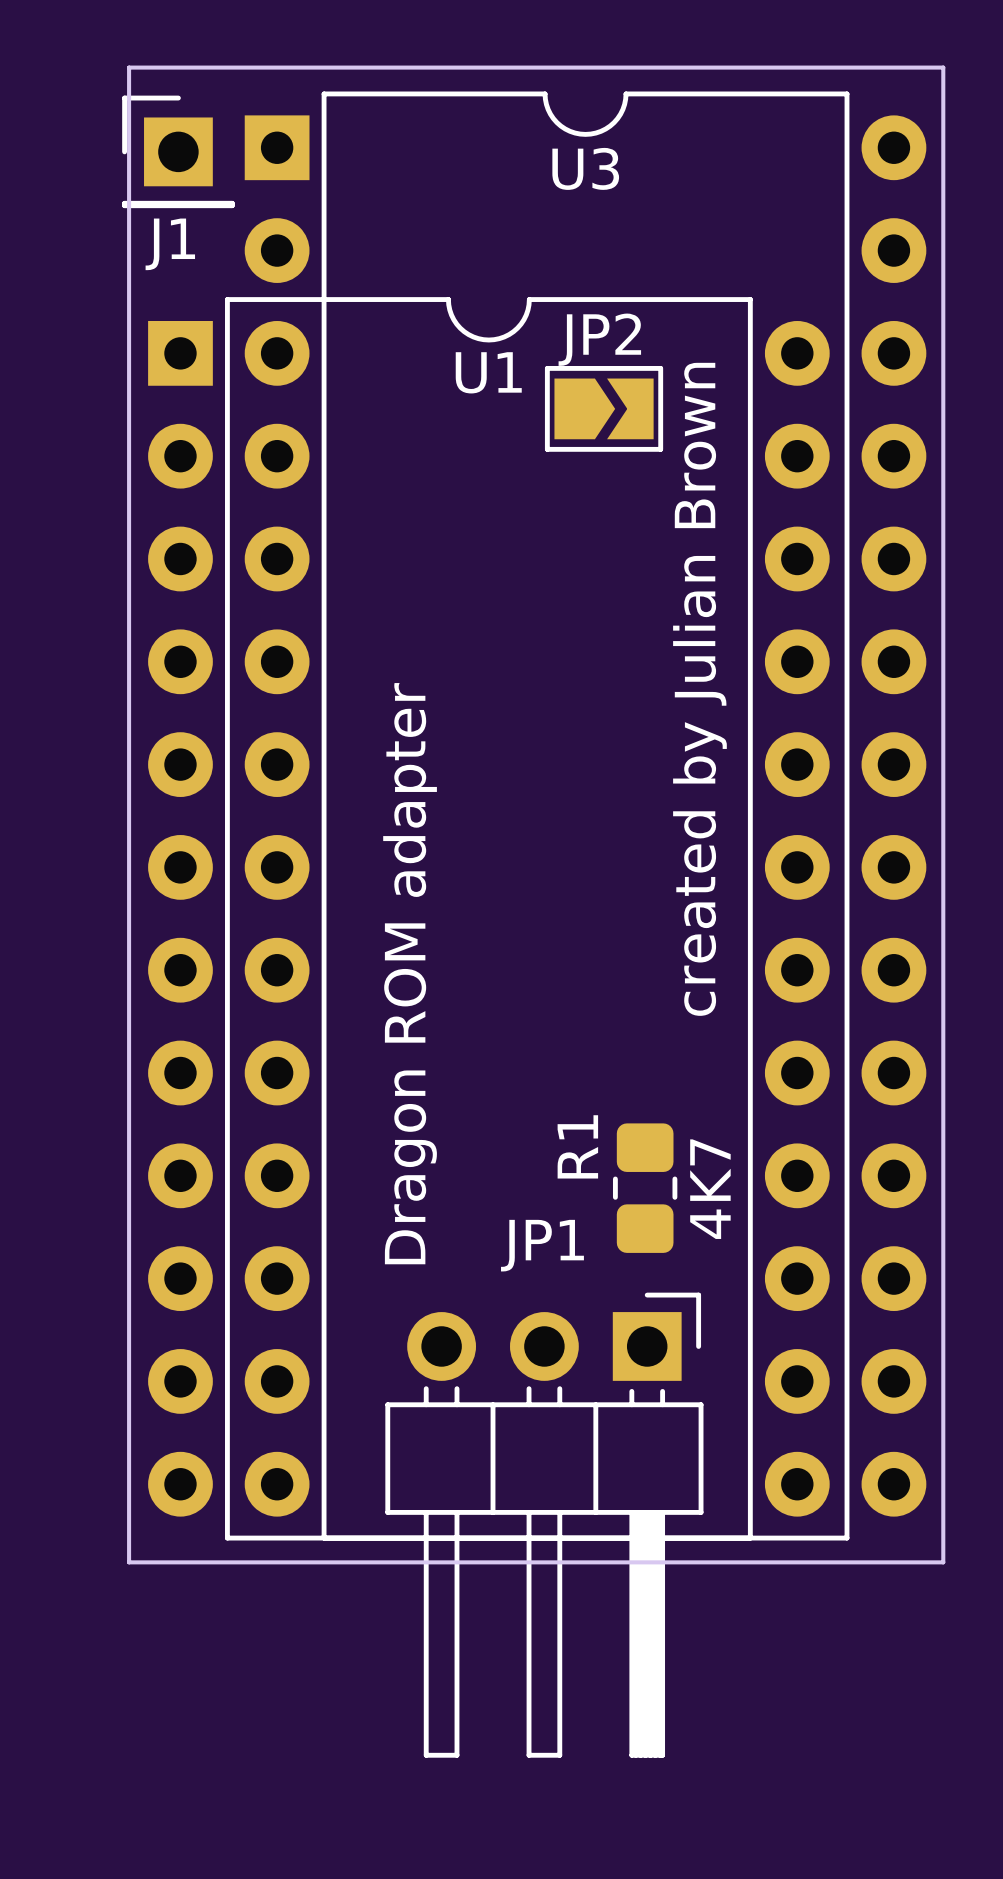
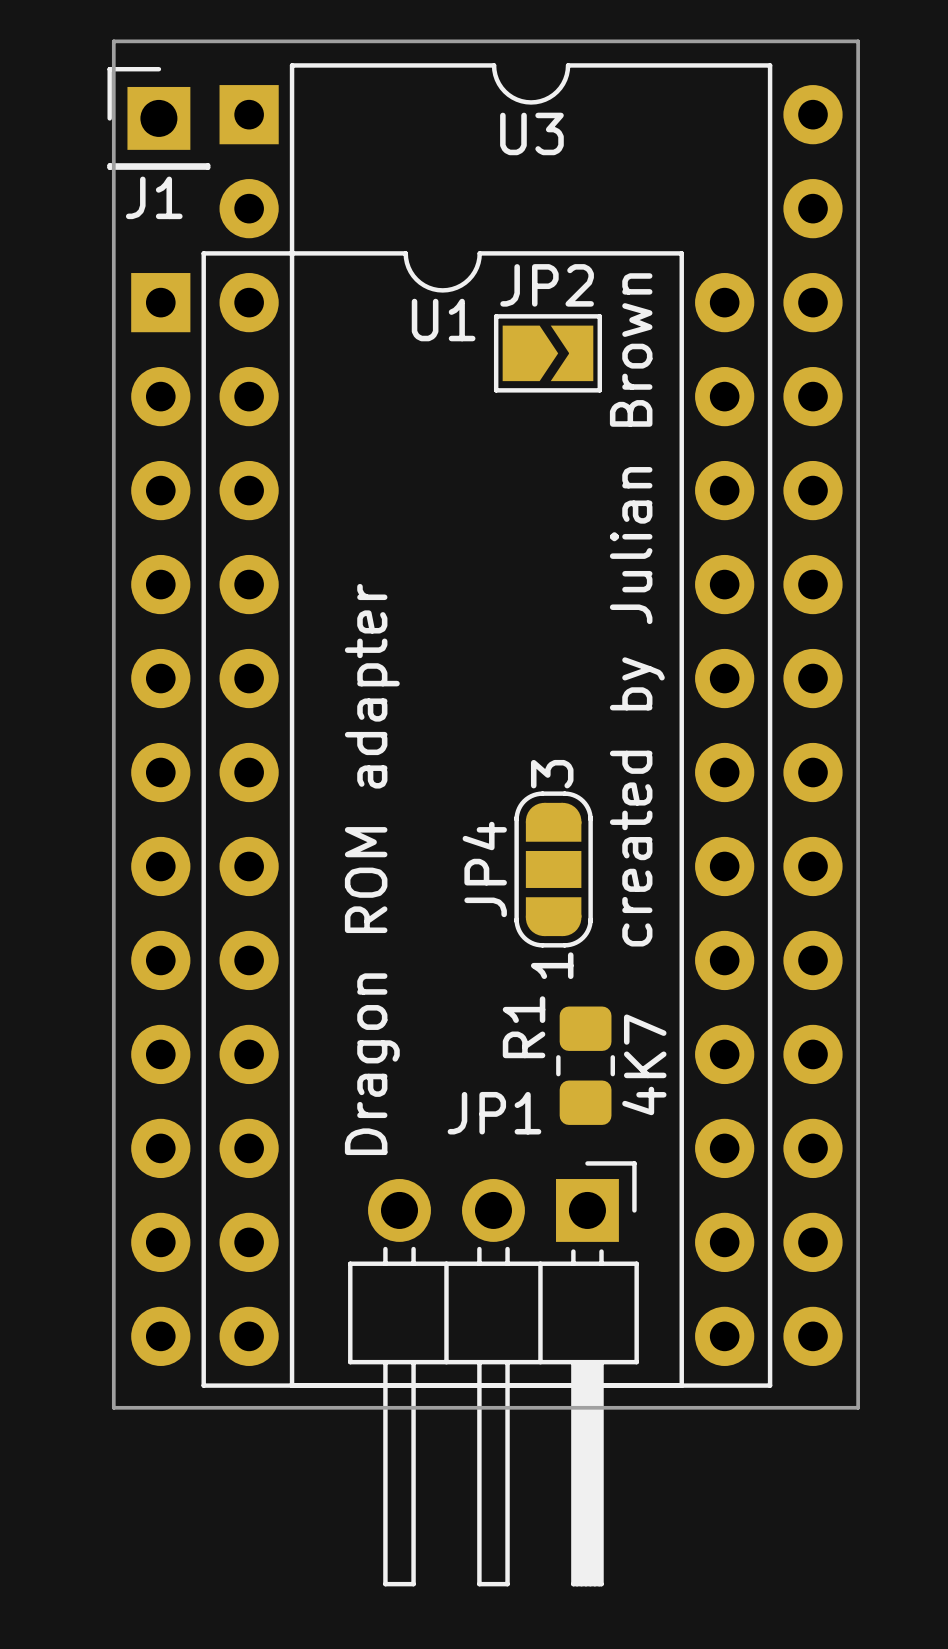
JP4: none -> (553, 869)

